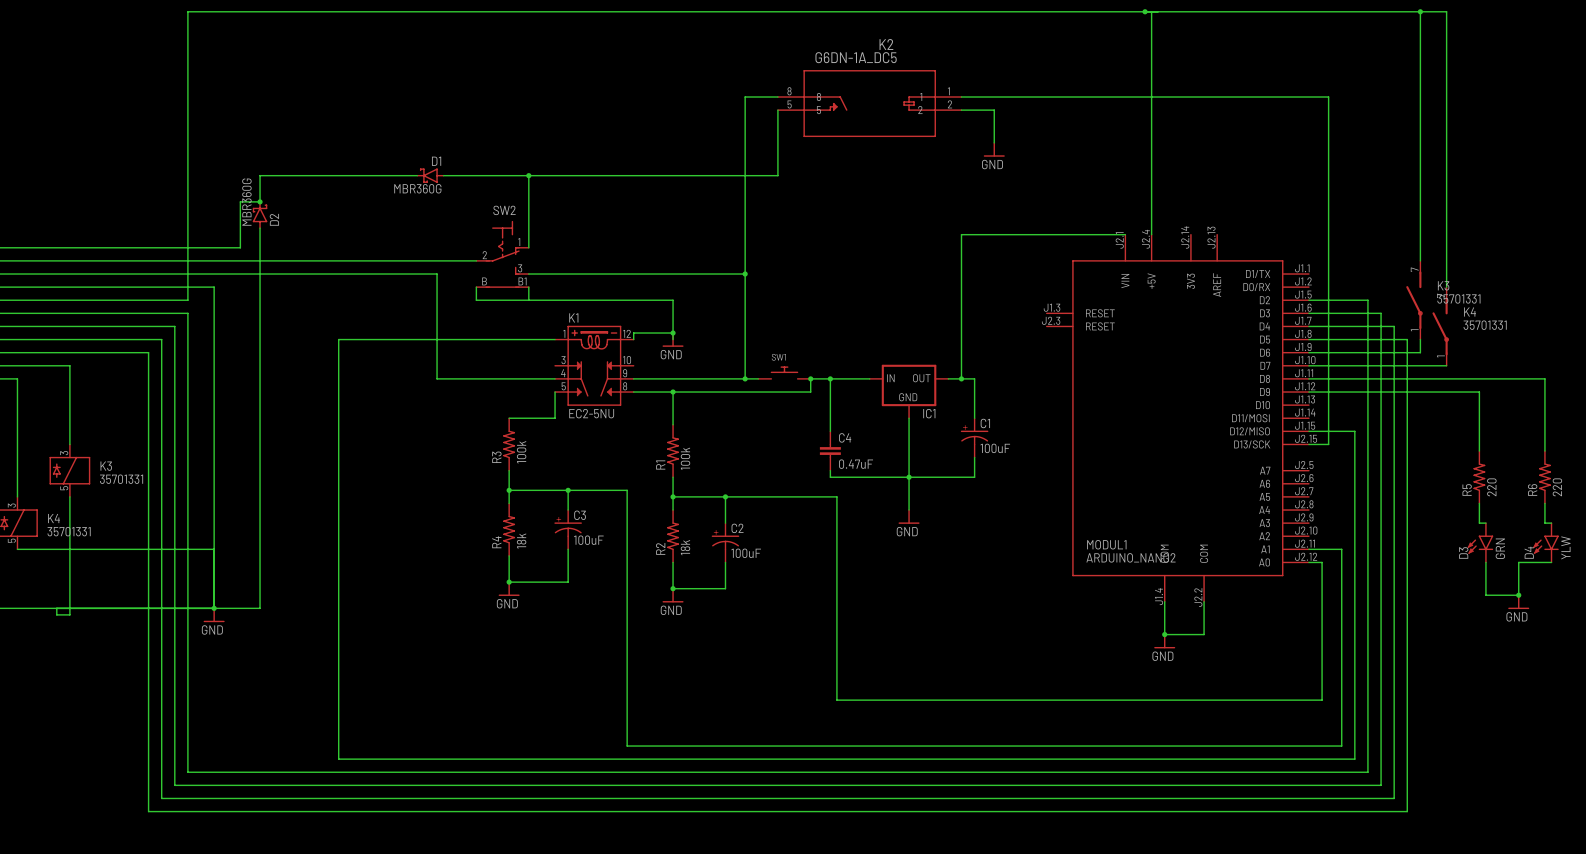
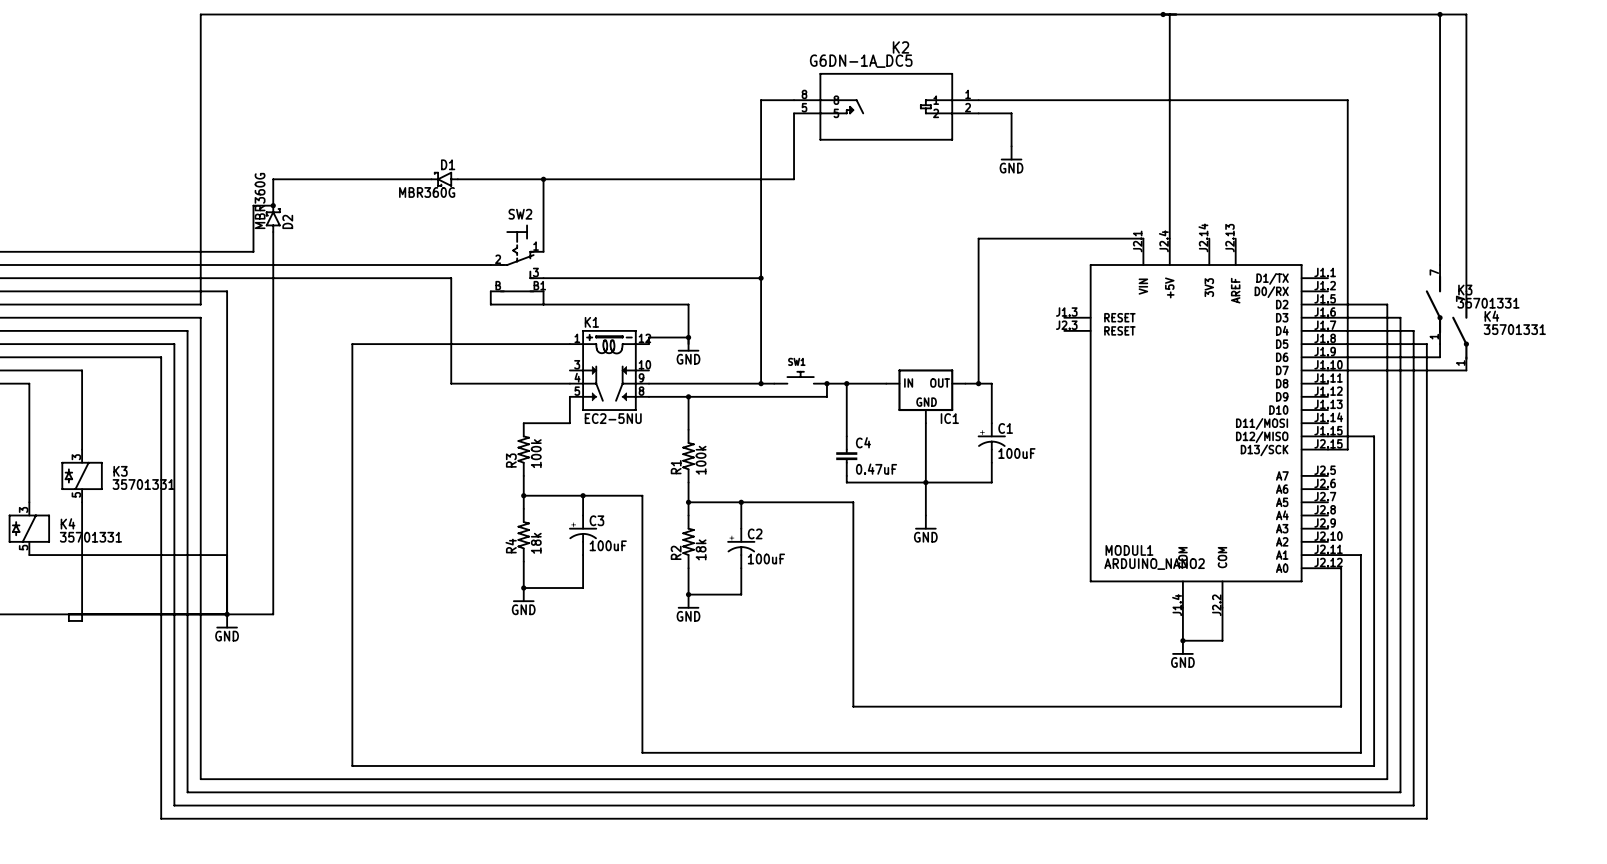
wire: (1308, 378) (1544, 378) (1544, 451) -> none
wire: (1308, 392) (1479, 392) (1479, 451) -> none
R5: 220 (1479, 477) -> none
R6: 220 (1544, 477) -> none
wire: (1479, 503) (1479, 523) (1485, 523) -> none
wire: (1544, 503) (1544, 523) (1551, 523) -> none
D3: GRN (1480, 542) -> none
D4: YLW (1546, 542) -> none
wire: (1485, 562) (1485, 595) (1518, 595) (1518, 562) (1551, 562) -> none
junction: (1518, 595) -> none
power symbol: GND (1518, 602) -> none

